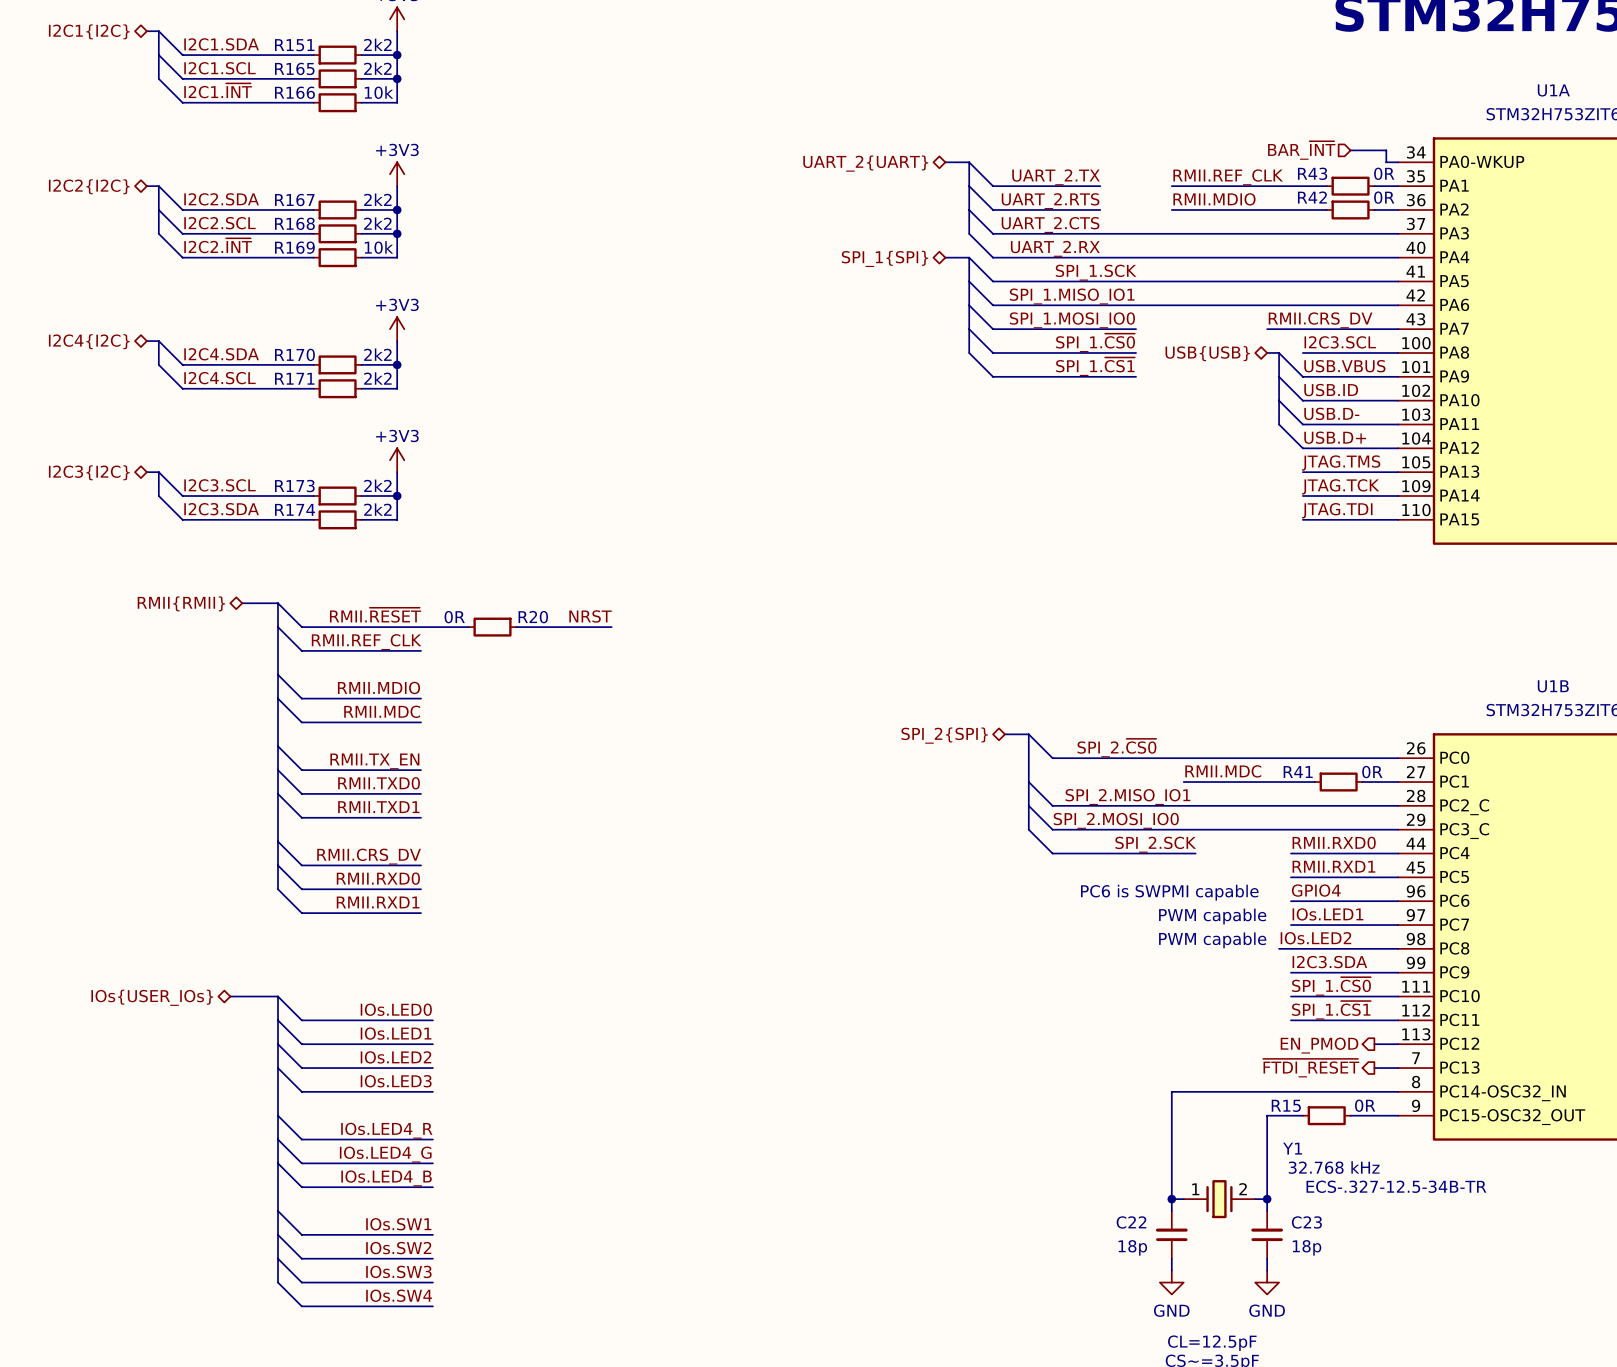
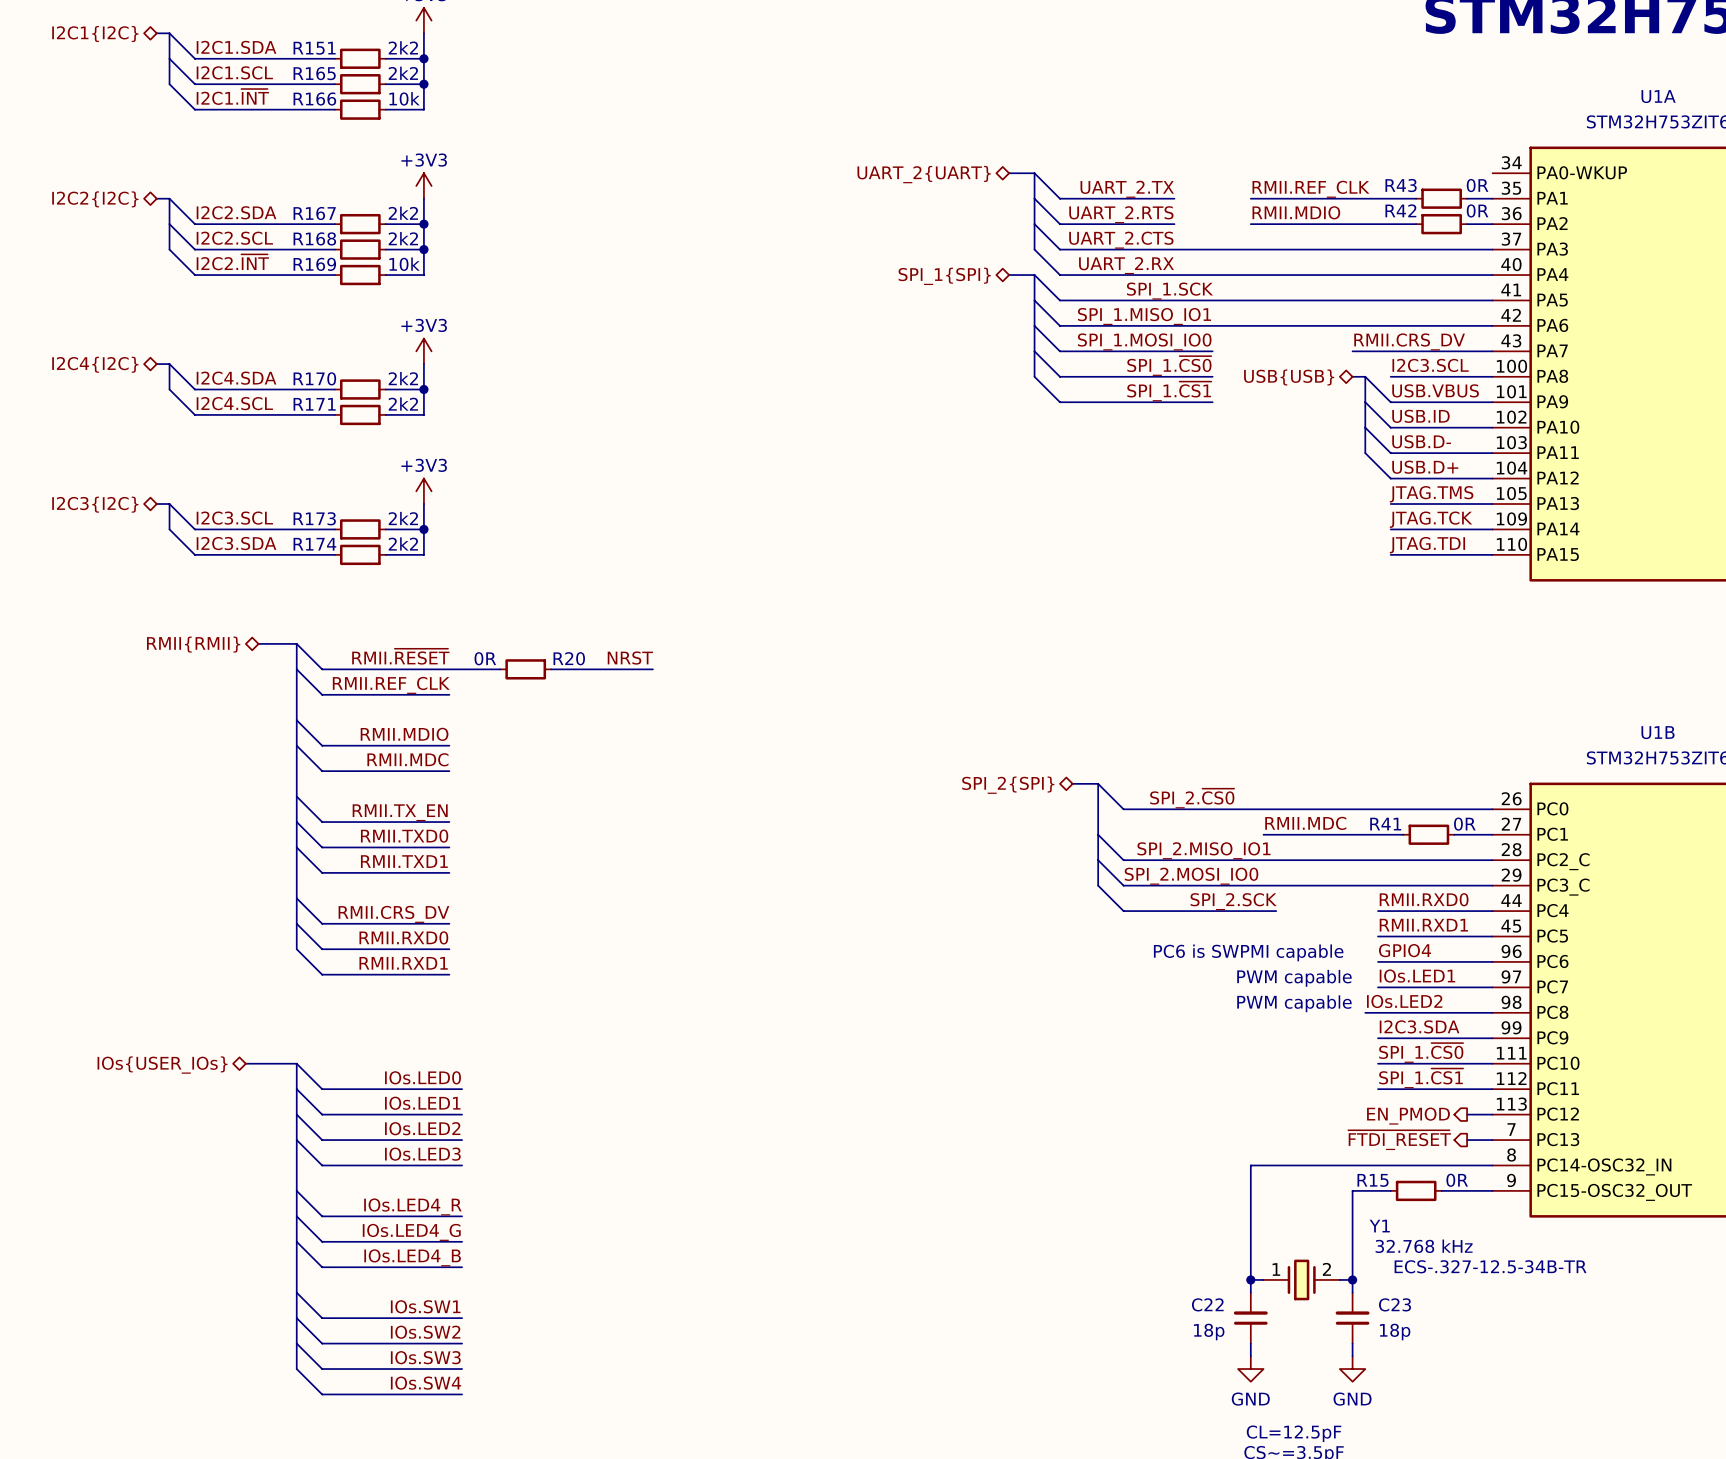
hierarchical label: BAR_~{INT} (1301, 150) -> none
wire: (1350, 150) (1386, 150) (1386, 162) (1398, 162) -> none

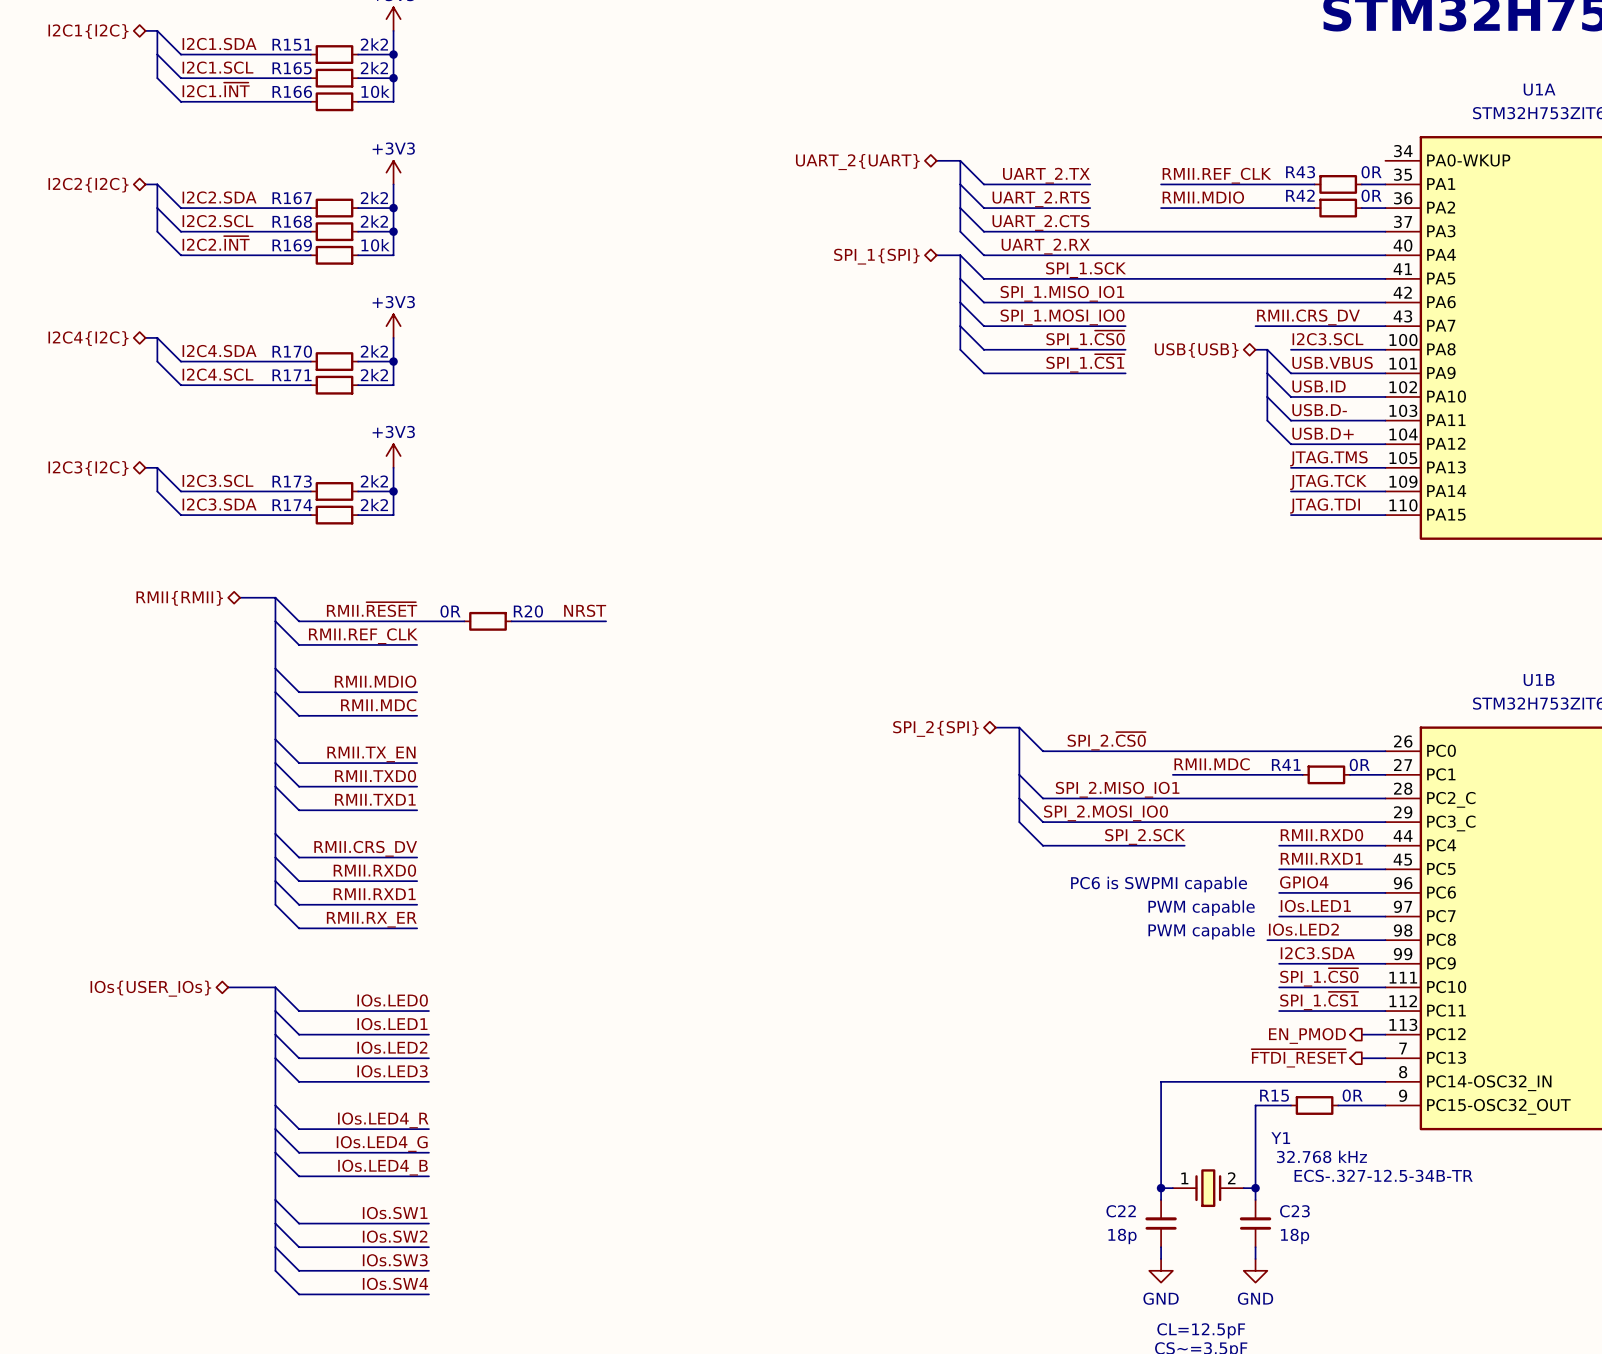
bus: none -> (275, 881) (275, 904)
wire: none -> (275, 904) (299, 928) (417, 928)
label: none -> RMII.RX_ER (371, 919)

